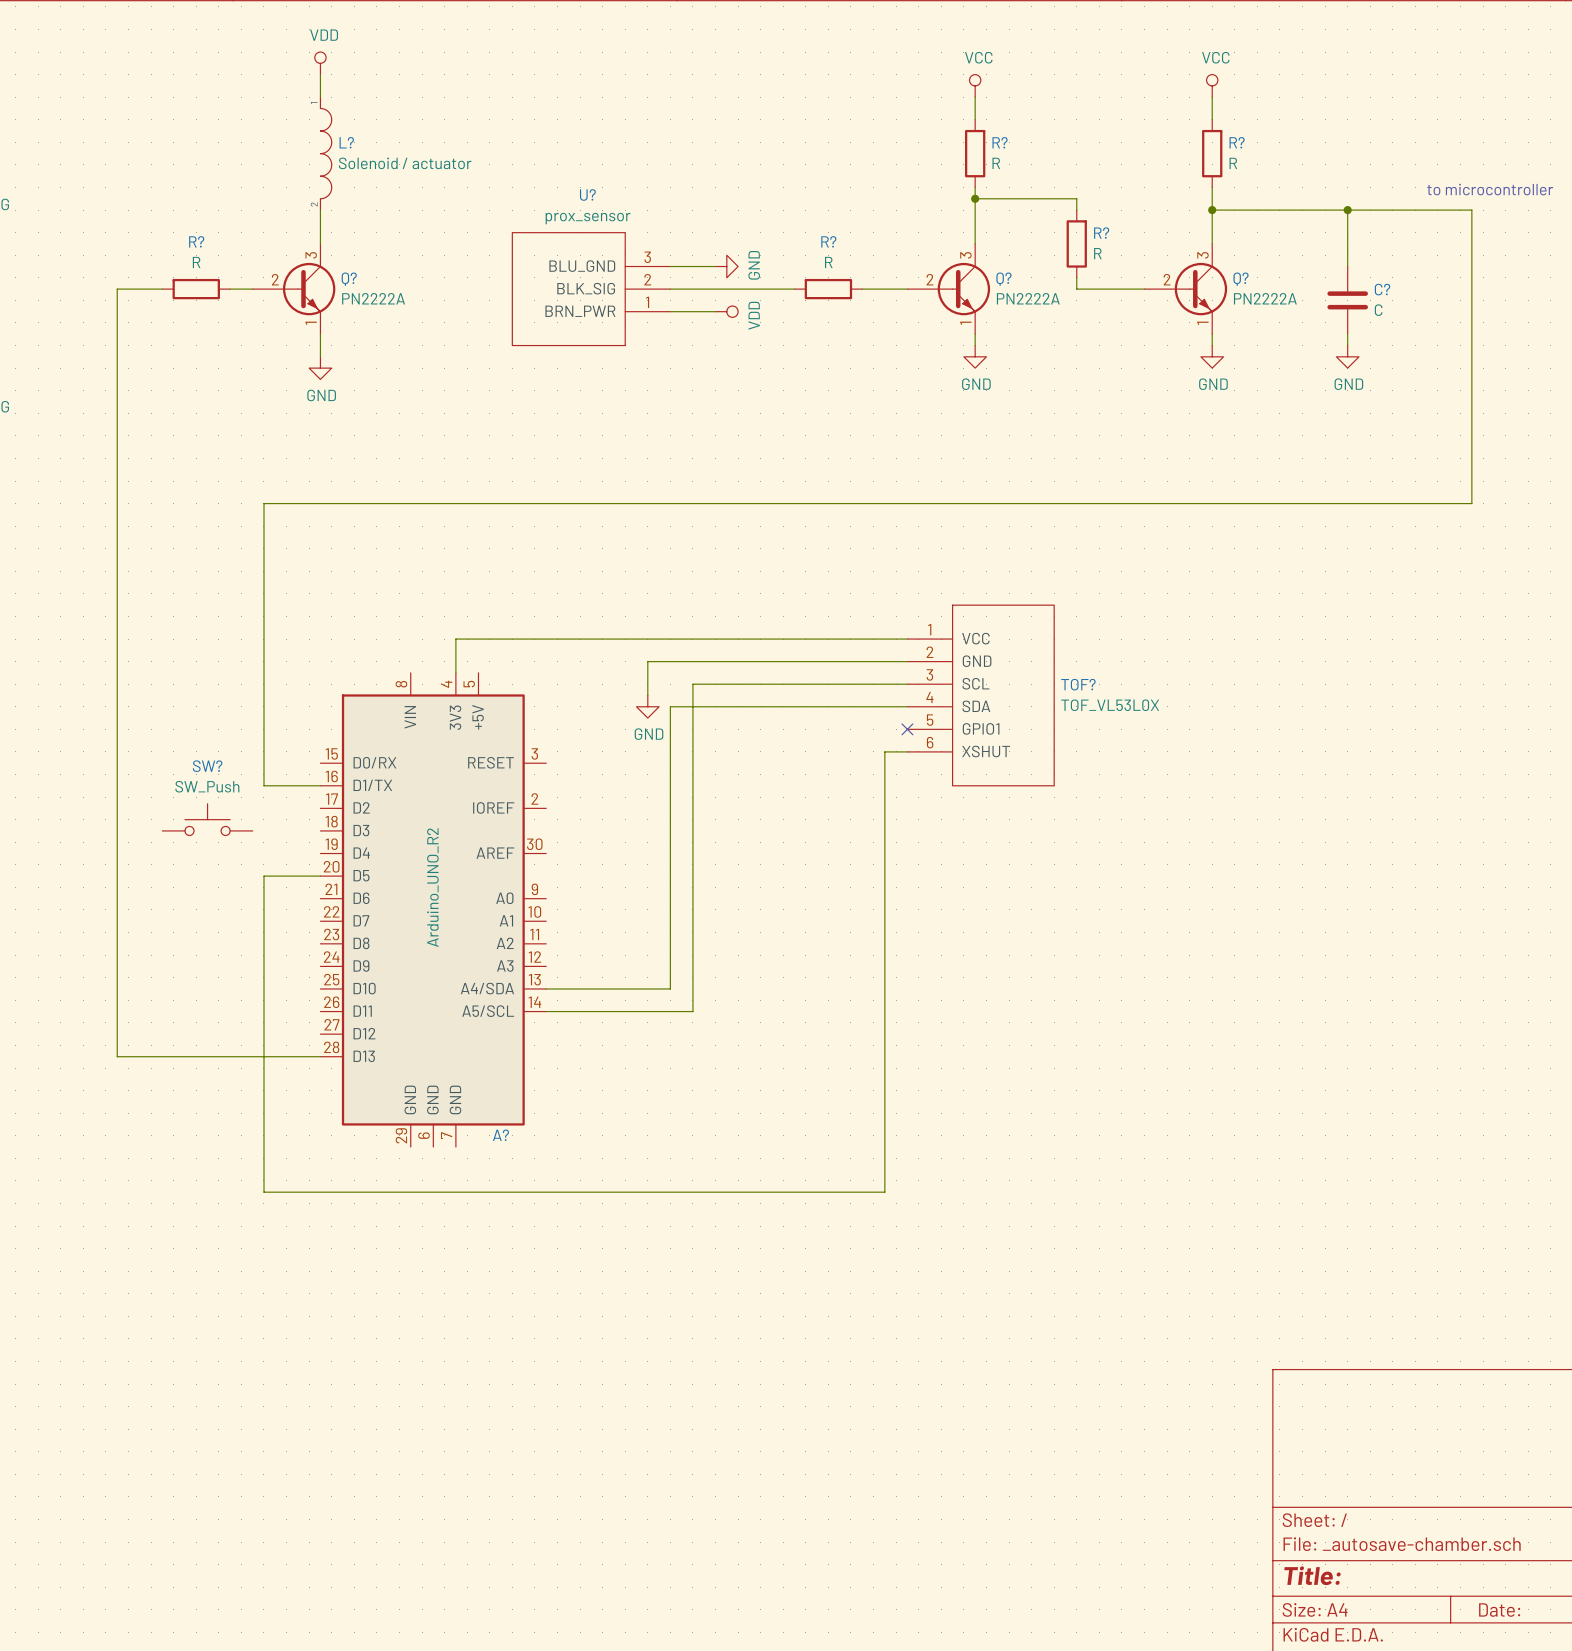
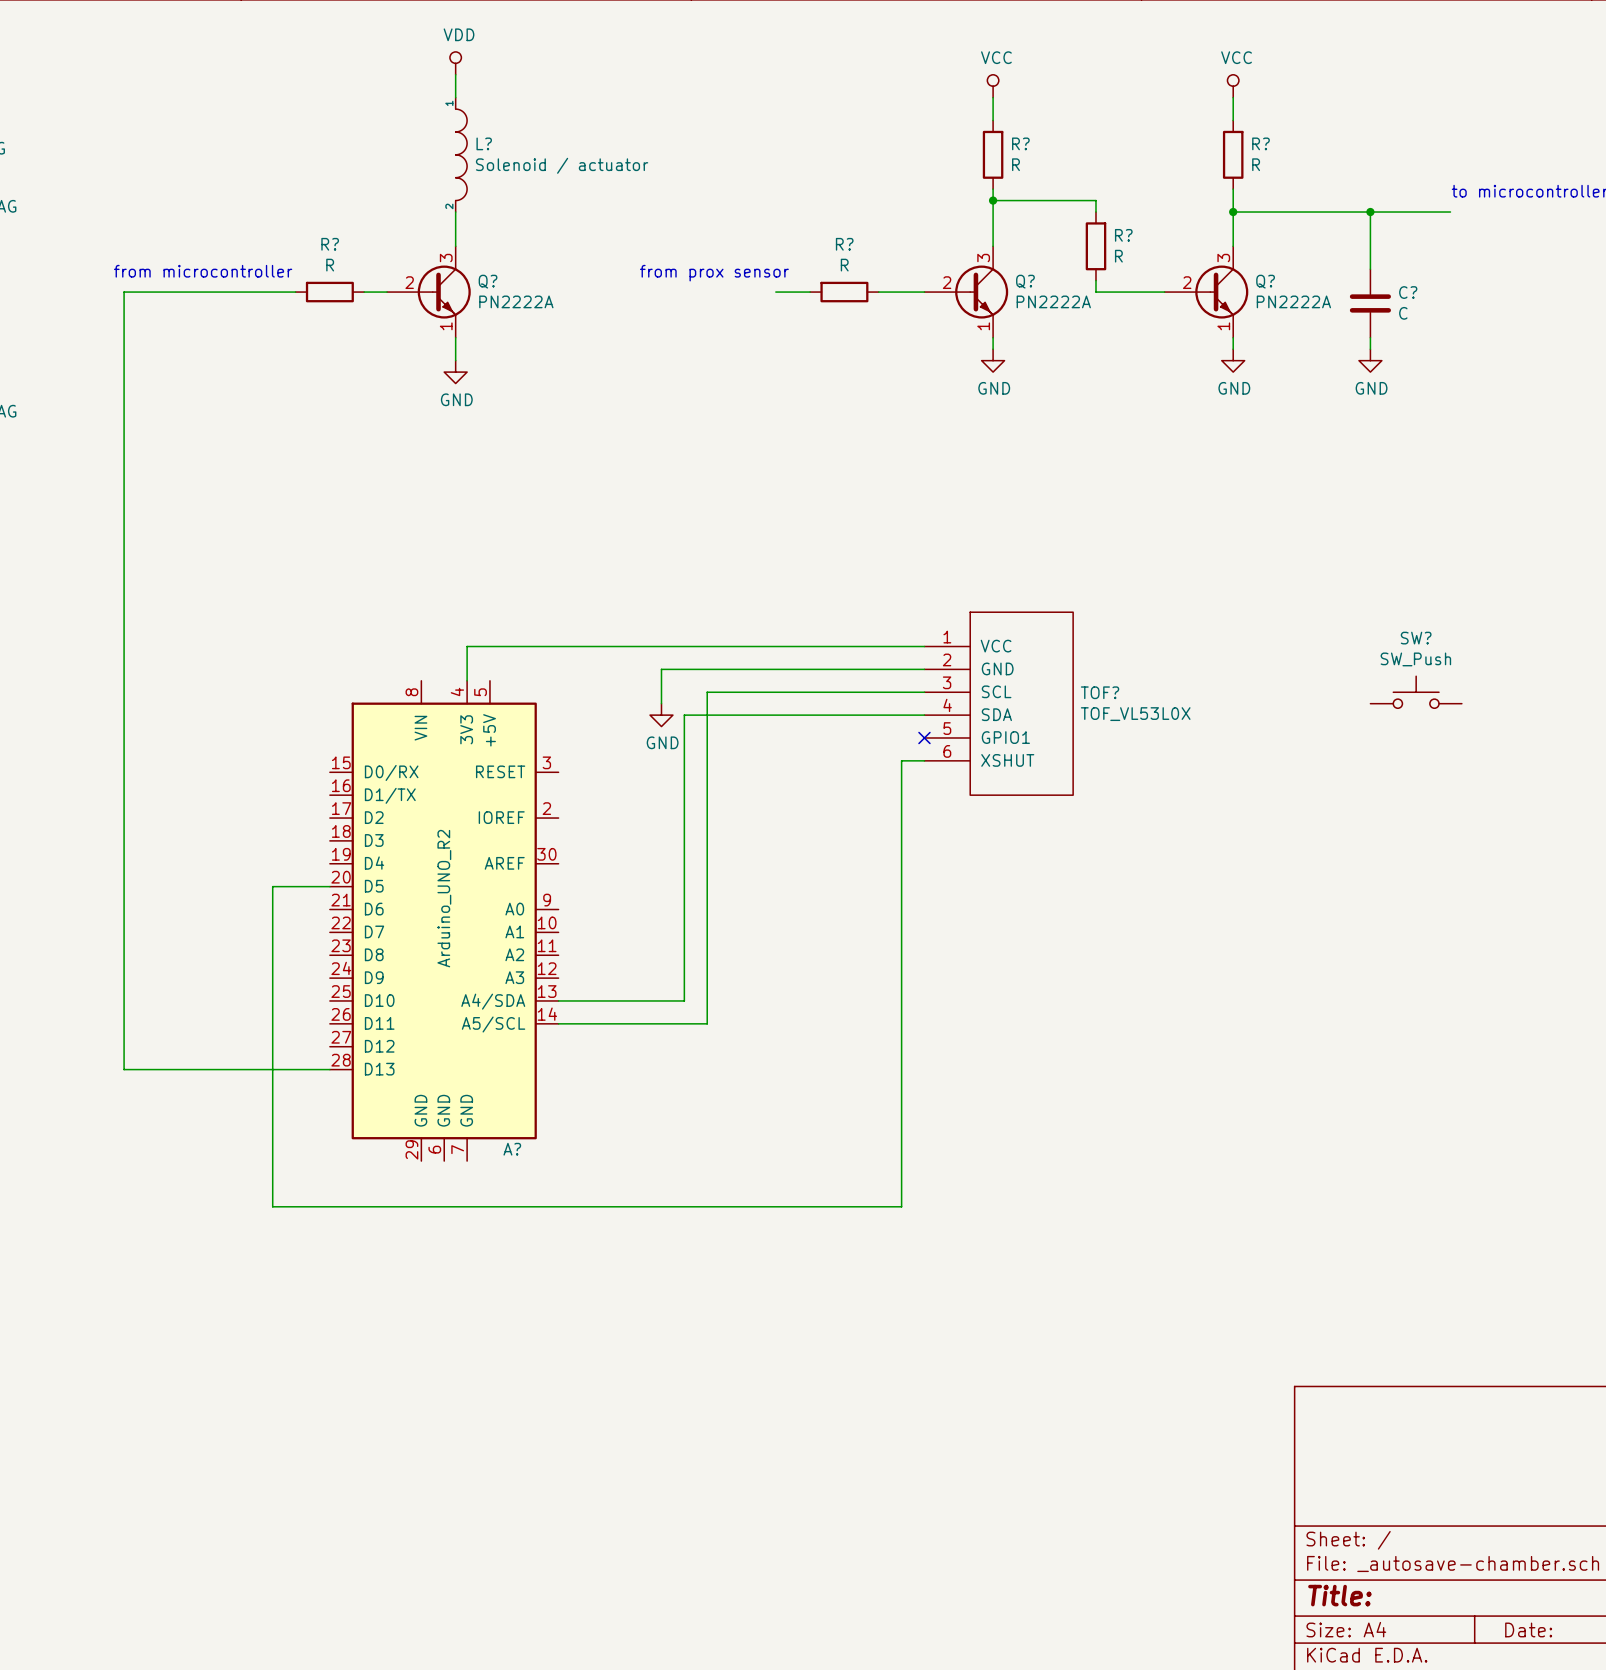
power symbol position: VDD (320, 63) -> VDD (455, 63)
wire: (320, 74) (320, 97) -> (455, 74) (455, 97)
L? position: (326, 153) -> (461, 154)
wire: (320, 210) (320, 243) -> (455, 212) (455, 246)
wire: (1426, 210) (1471, 210) (1471, 503) (263, 503) (263, 785) (320, 785) -> none
wire: (670, 266) (715, 266) -> none
power symbol: GND (726, 266) -> none
text: none -> from microcontroller (203, 271)
text: none -> from prox sensor (714, 273)
wire: none -> (169, 292) (238, 292)
R? position: (196, 289) -> (329, 292)
Q? position: (294, 289) -> (428, 292)
wire: none -> (364, 292) (387, 292)
U?: prox_sensor (585, 289) -> none
wire: (670, 289) (760, 289) -> none
wire: (670, 311) (715, 311) -> none
power symbol: VDD (726, 311) -> none
wire: (320, 334) (320, 356) -> (455, 337) (455, 360)
power symbol position: GND (320, 368) -> GND (455, 372)
SW?: none -> SW_Push (1416, 692)
SW?: SW_Push (207, 819) -> none

